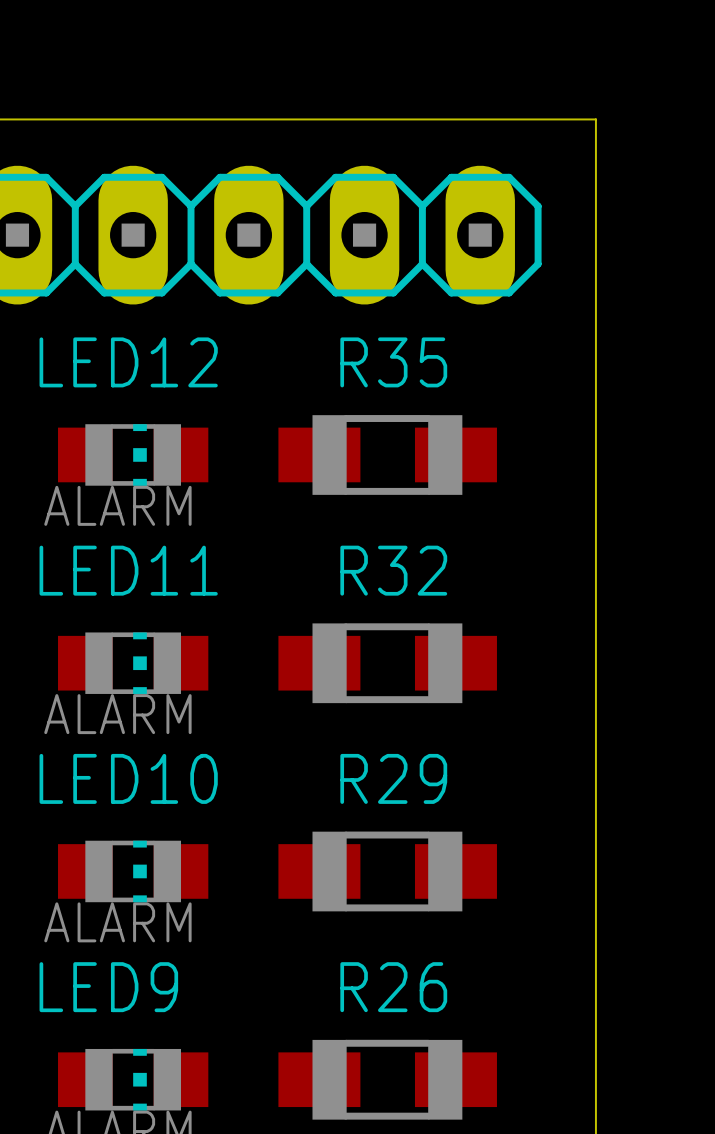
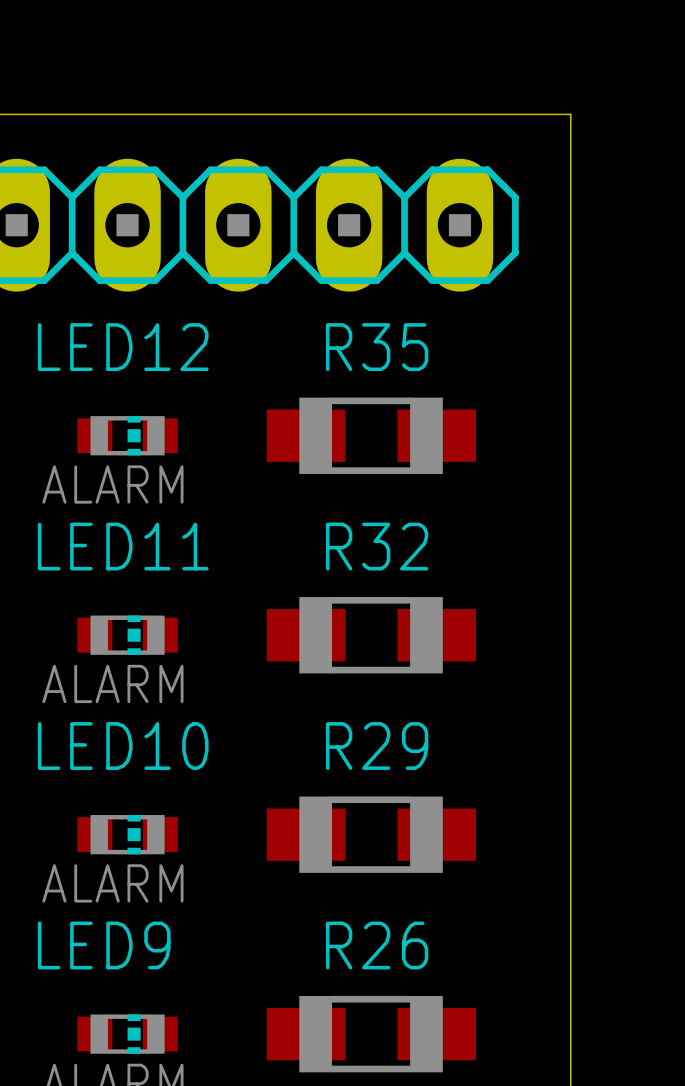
LED12 footprint: [58, 424, 209, 486] -> [77, 416, 178, 456]
LED11 footprint: [58, 632, 209, 694] -> [77, 615, 178, 655]
LED10 footprint: [58, 840, 209, 903] -> [77, 814, 178, 855]
LED9 footprint: [58, 1048, 209, 1111] -> [77, 1014, 178, 1054]

